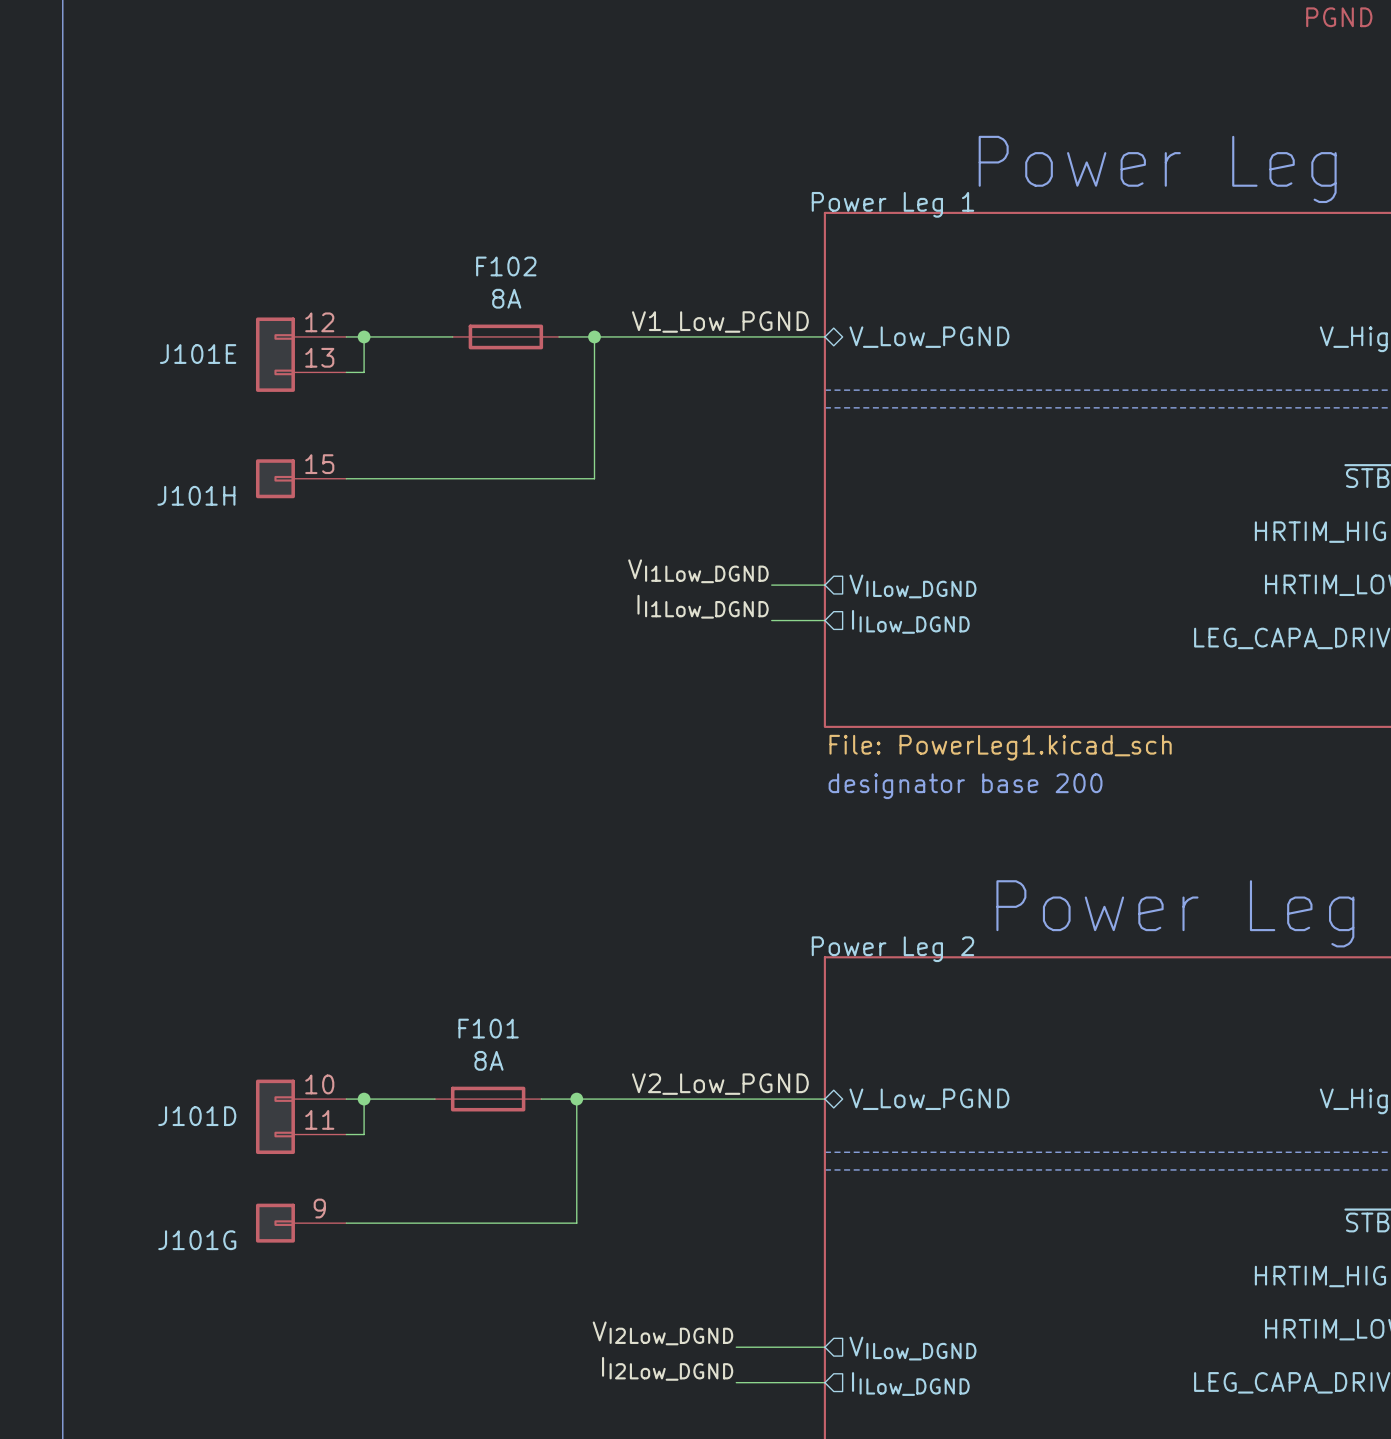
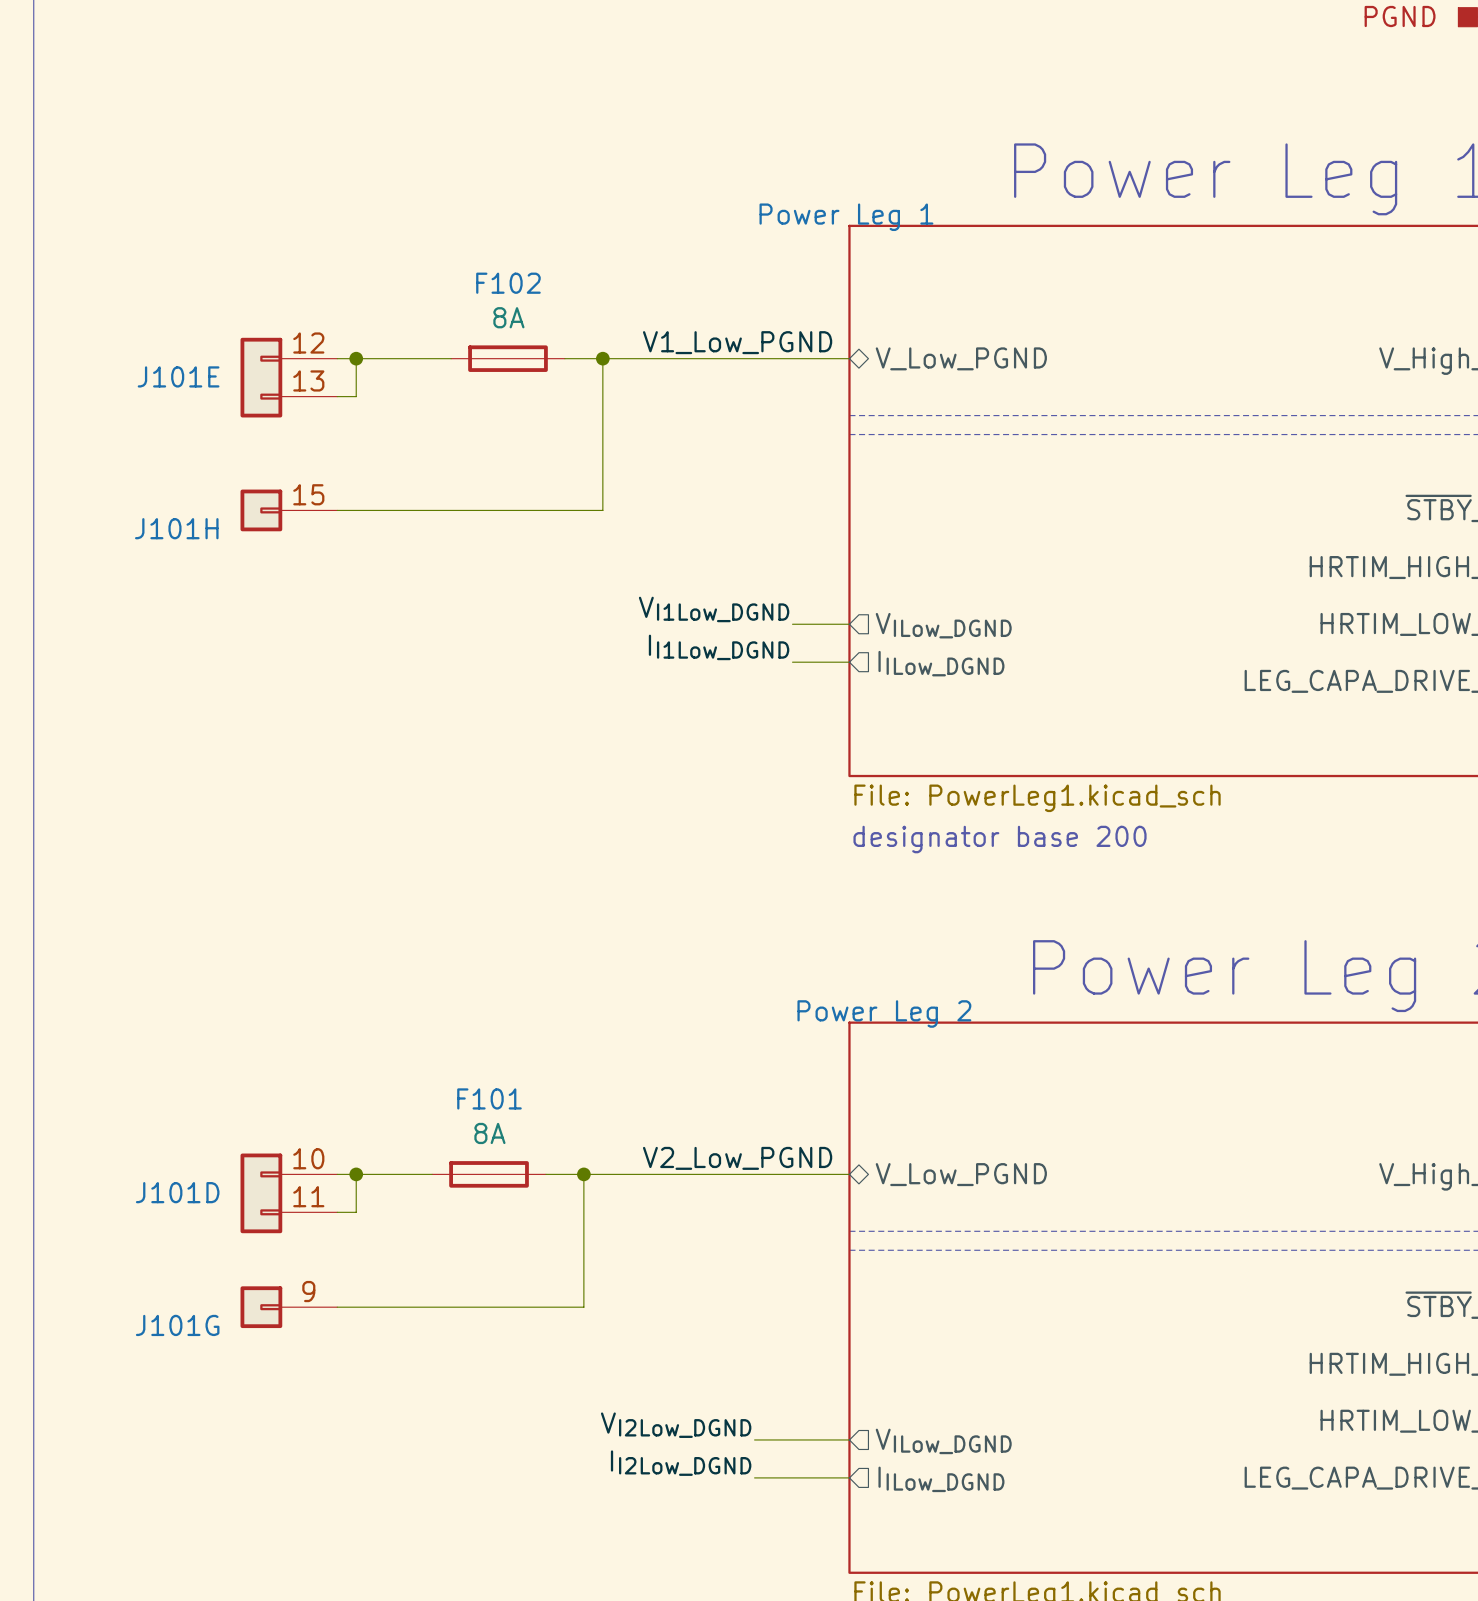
sheet Power Leg 1 name position: Power Leg 1 (892, 204) -> Power Leg 1 (846, 217)
sheet Power Leg 2 name position: Power Leg 2 (892, 949) -> Power Leg 2 (884, 1013)

